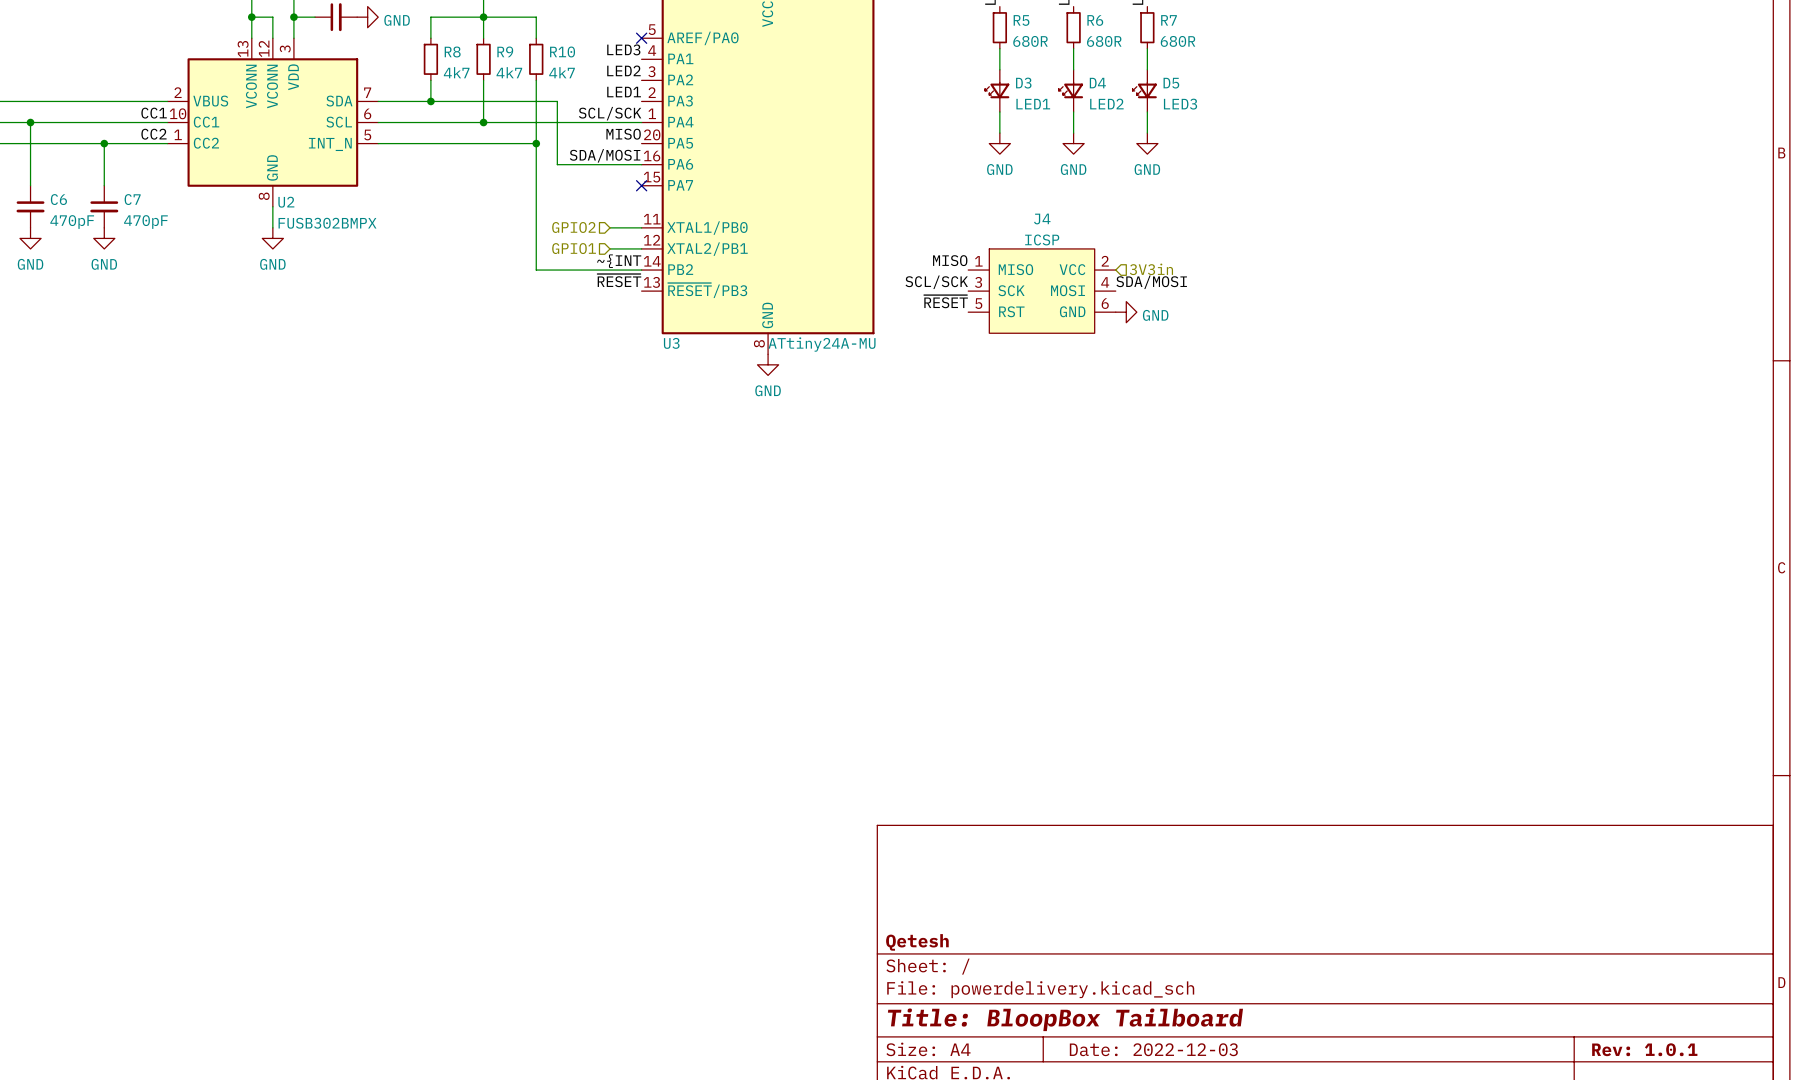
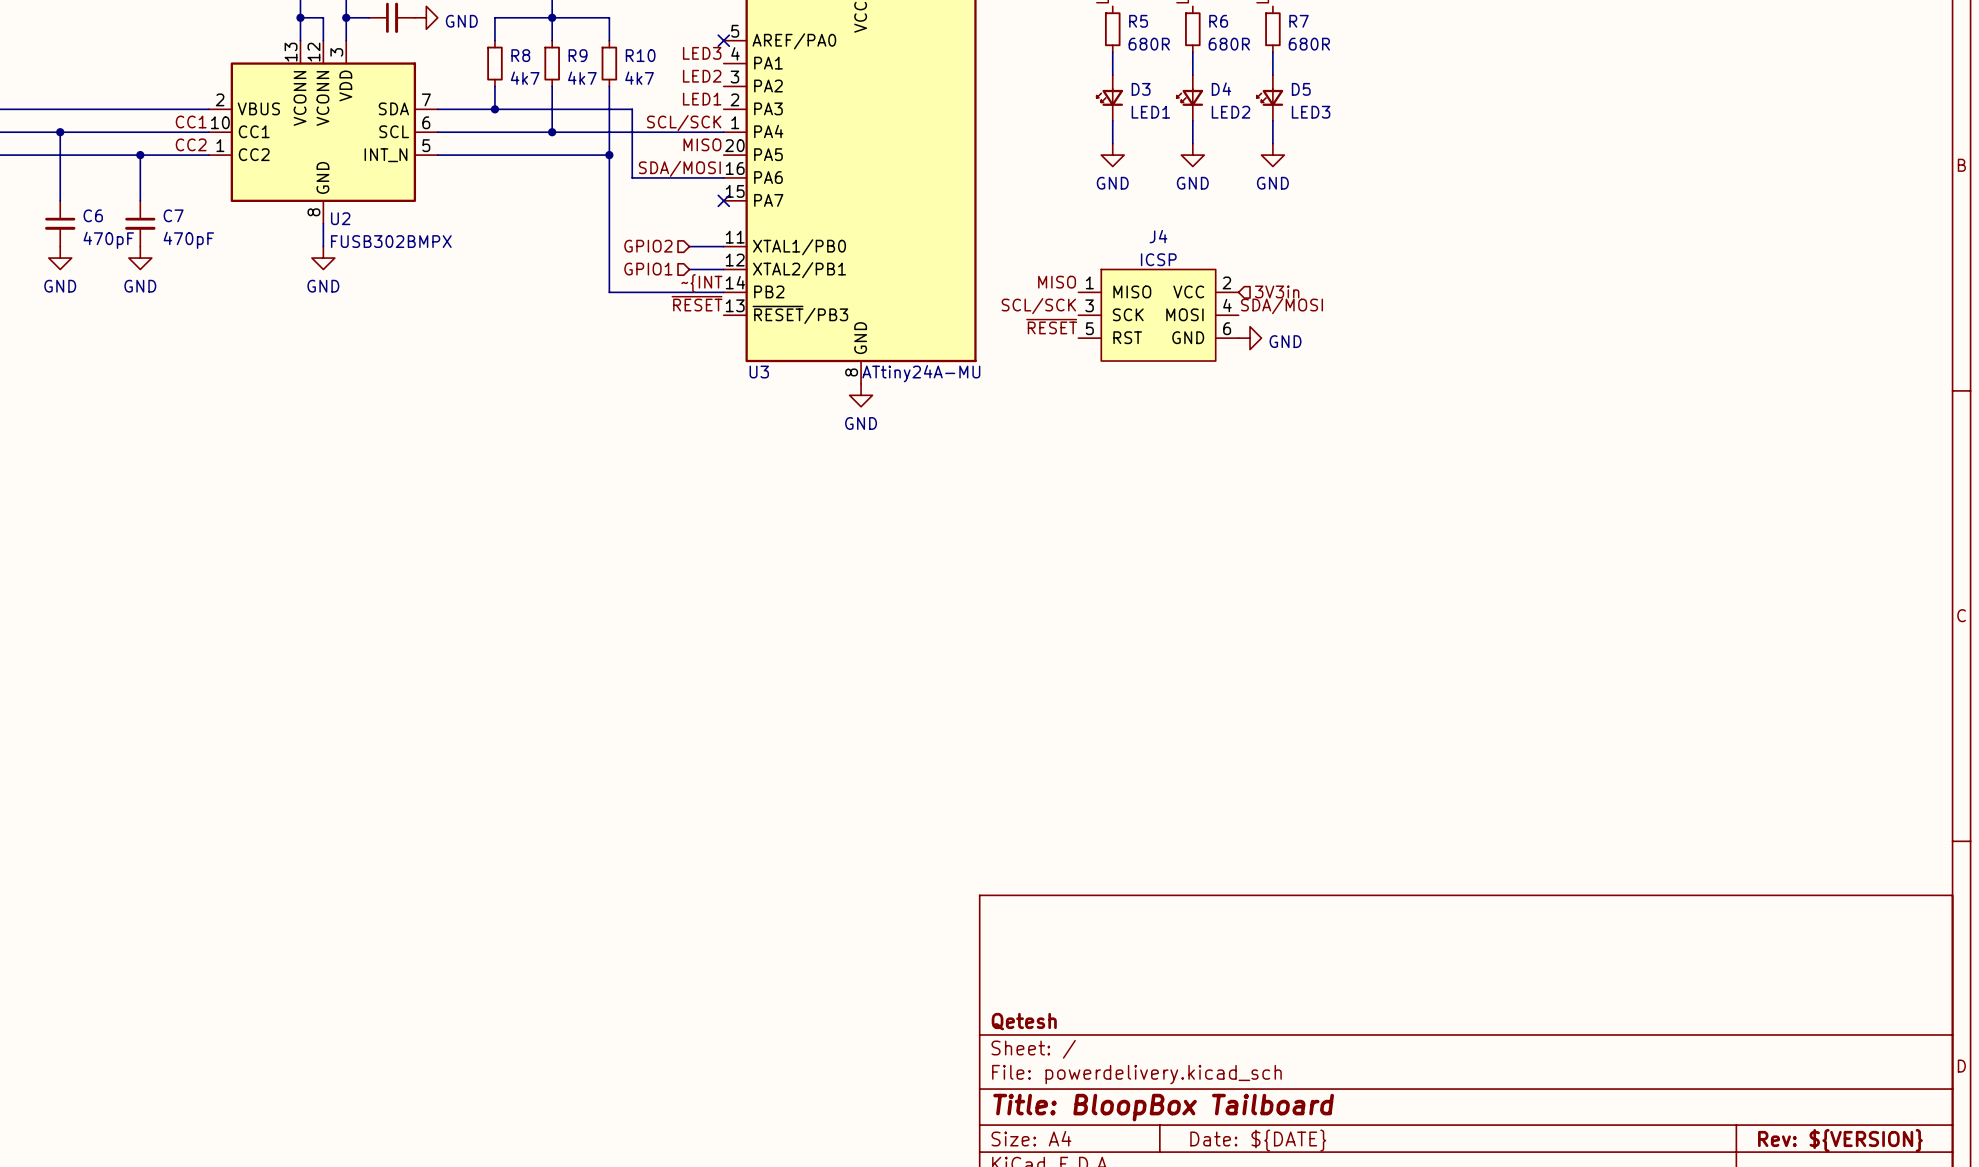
title block: Date: 2022-12-03 (1153, 1049) -> Date: ${DATE} (1258, 1140)
title block: Rev: 1.0.1 (1644, 1049) -> Rev: ${VERSION} (1840, 1140)

